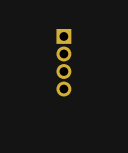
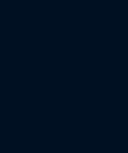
part: (63, 62) -> none

